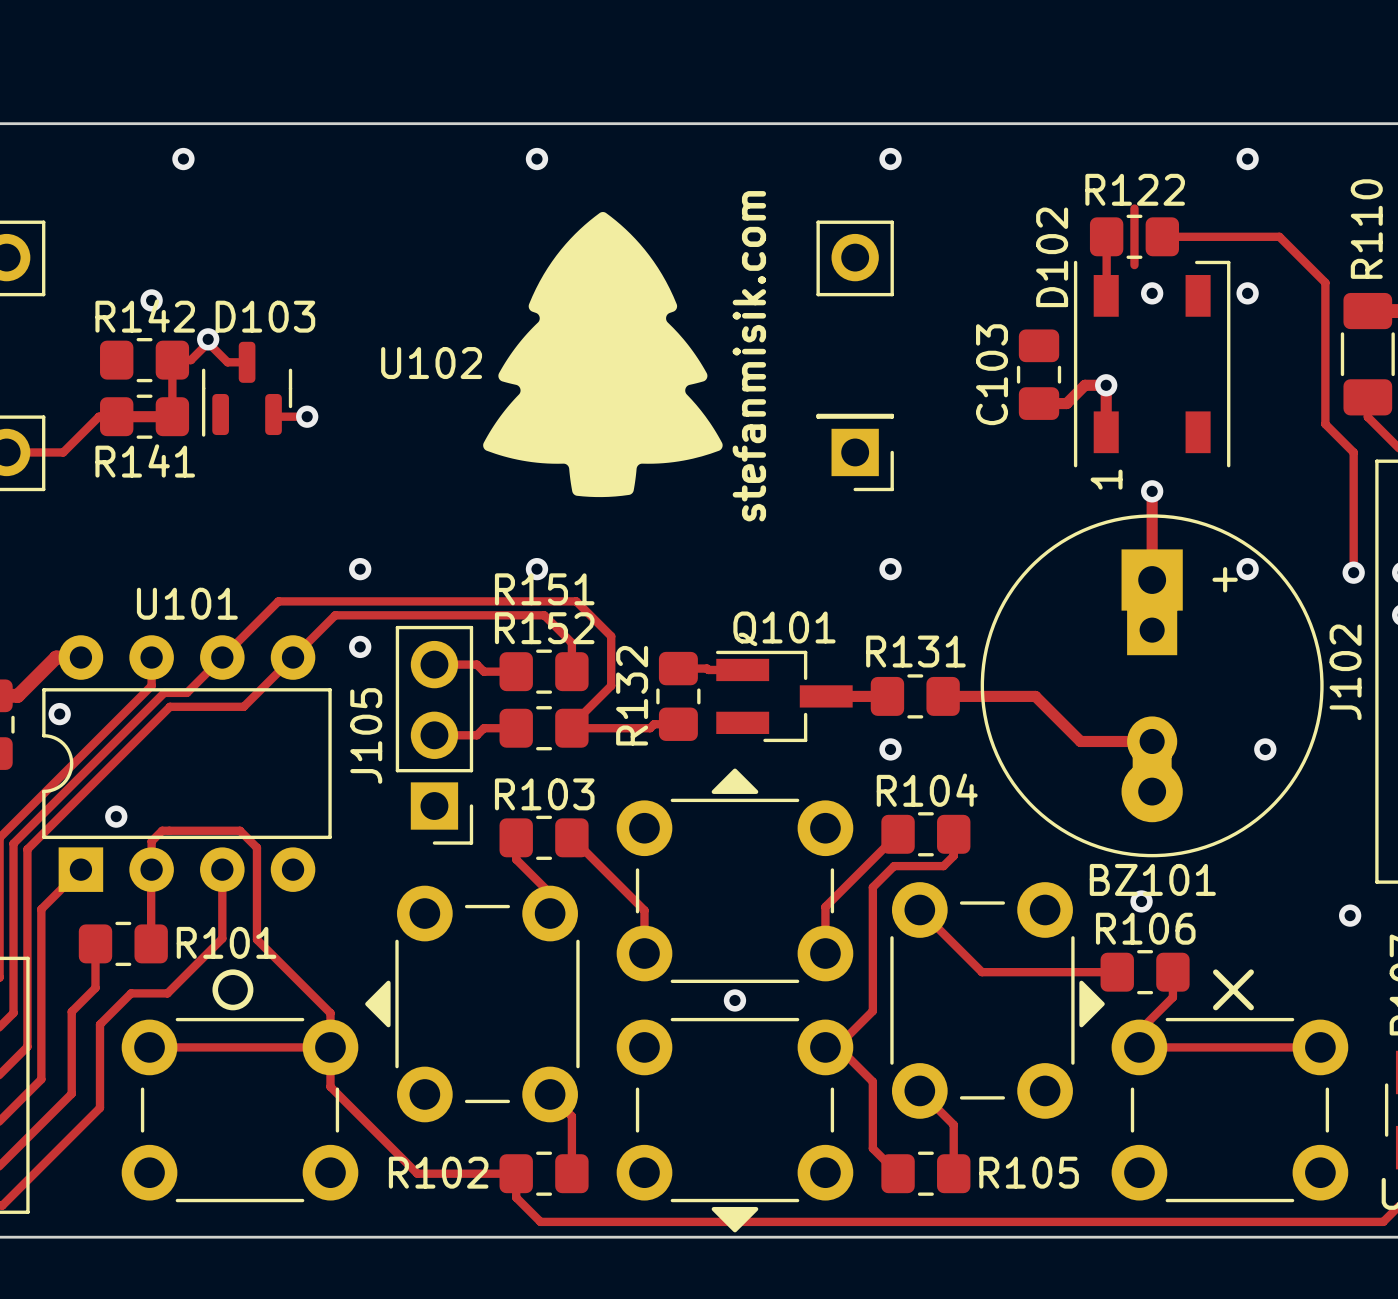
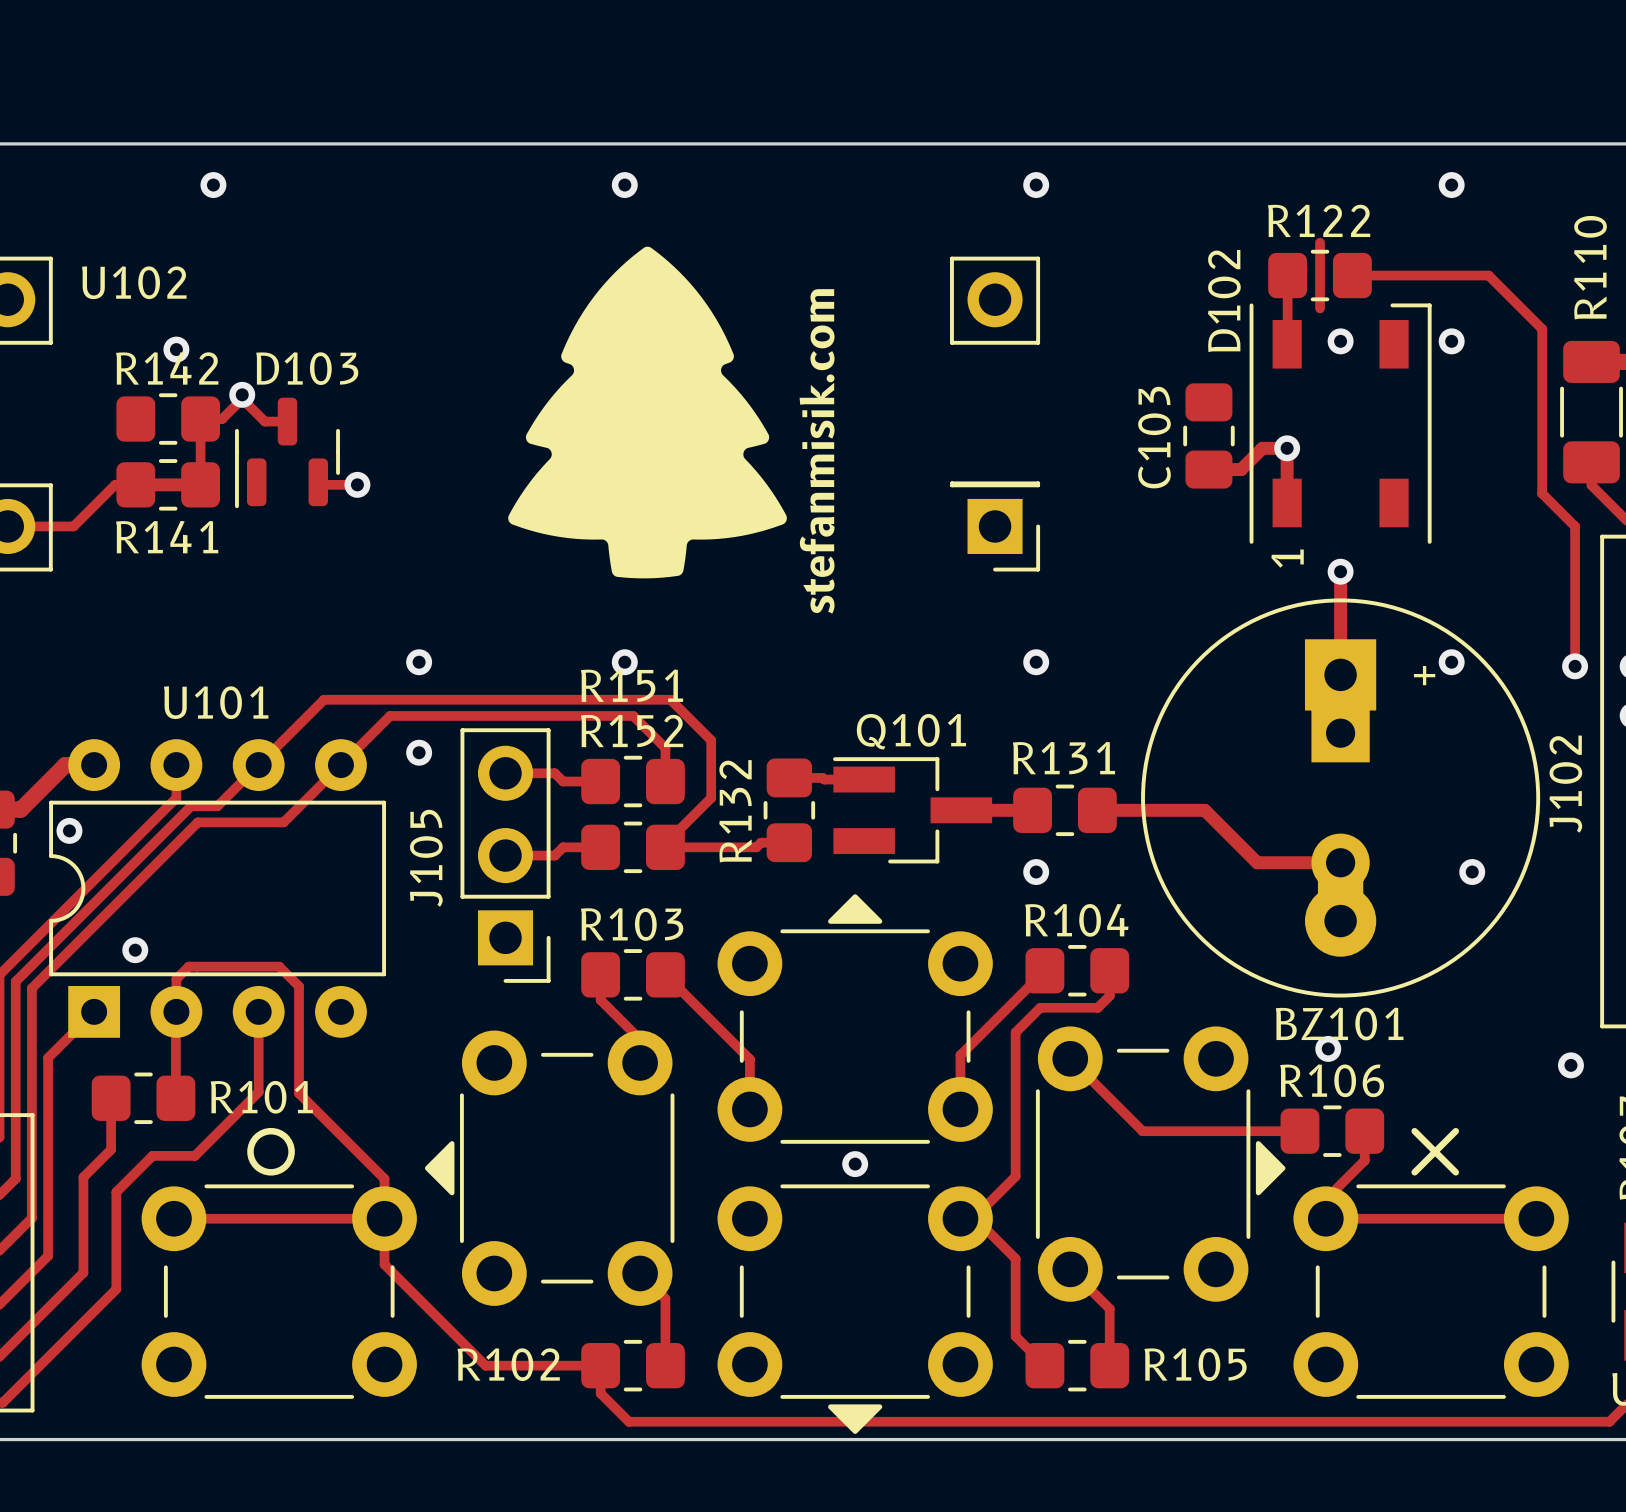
drawing position: (602, 354) -> (647, 412)
text position: stefanmisik.com (749, 356) -> stefanmisik.com (817, 451)
U102 name position: U102 (431, 363) -> U102 (134, 282)

